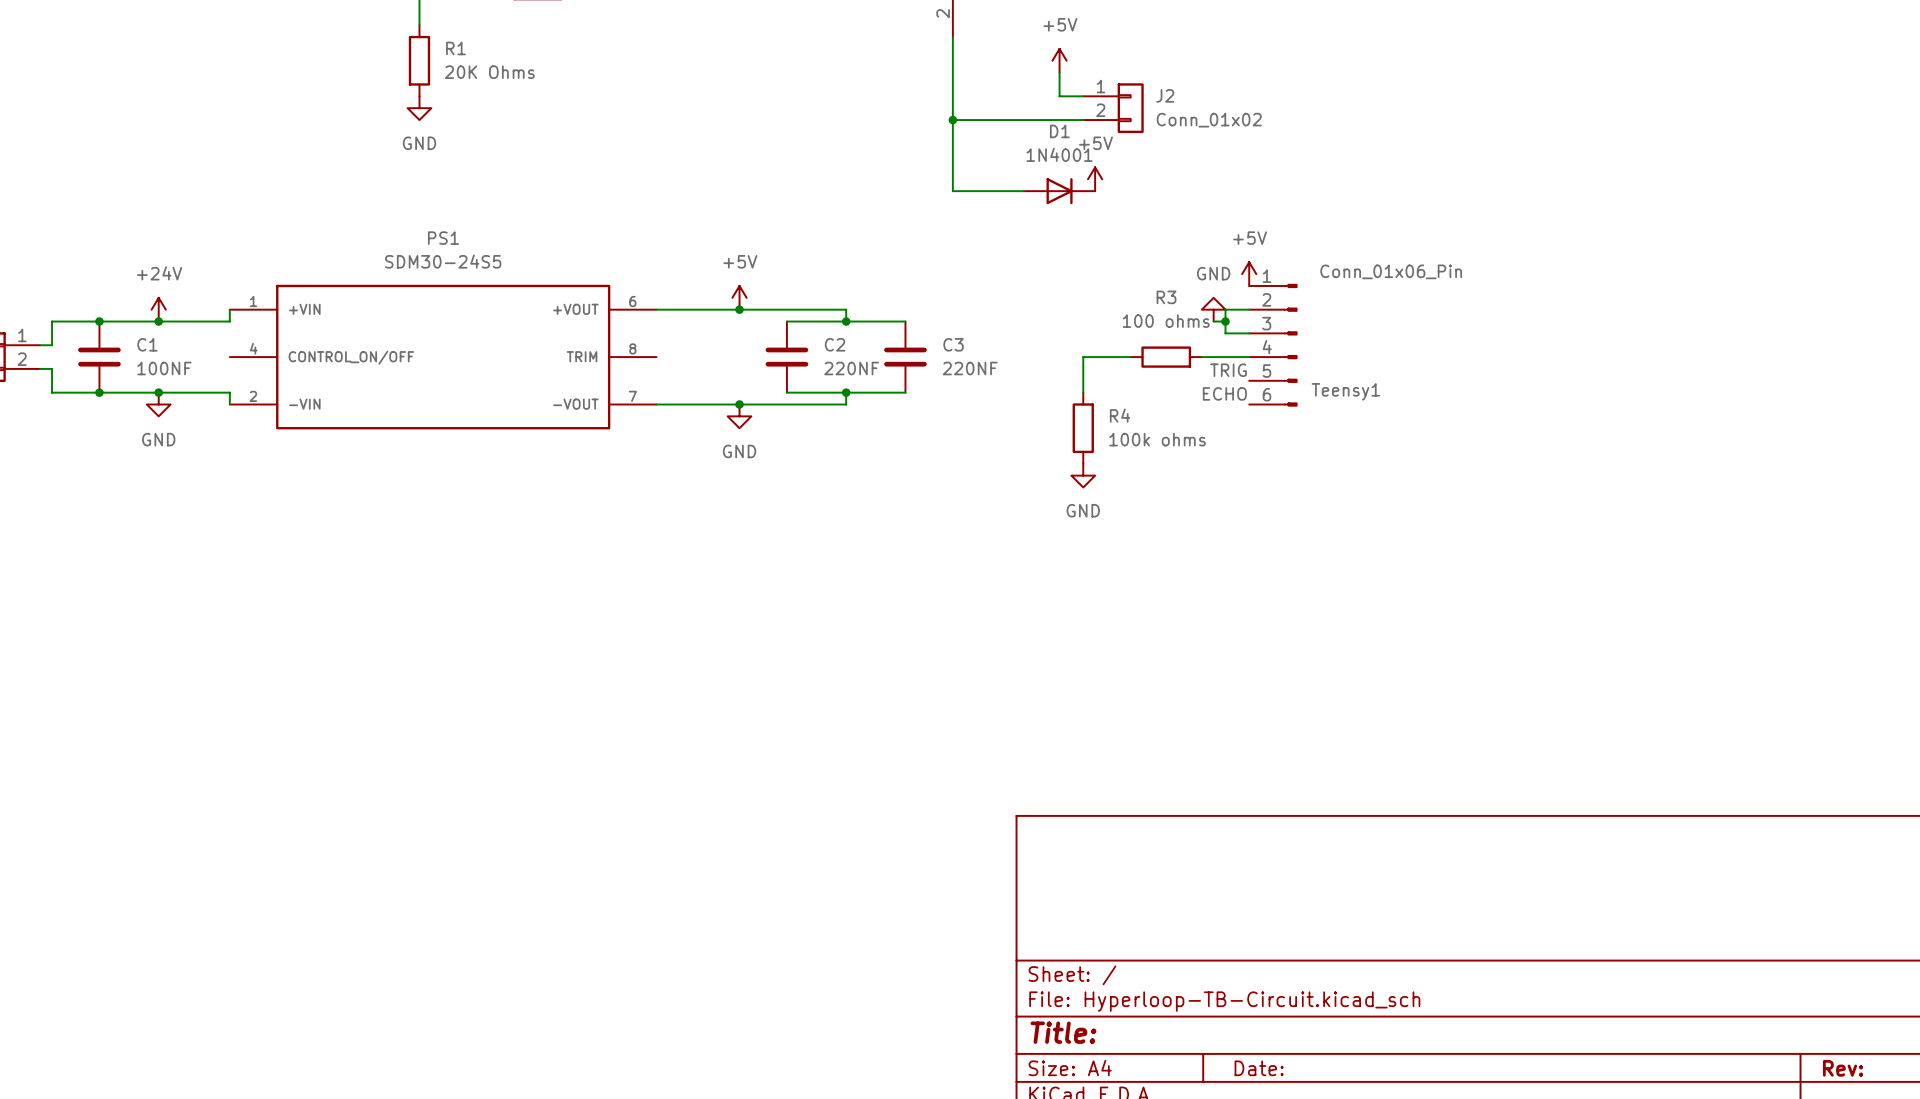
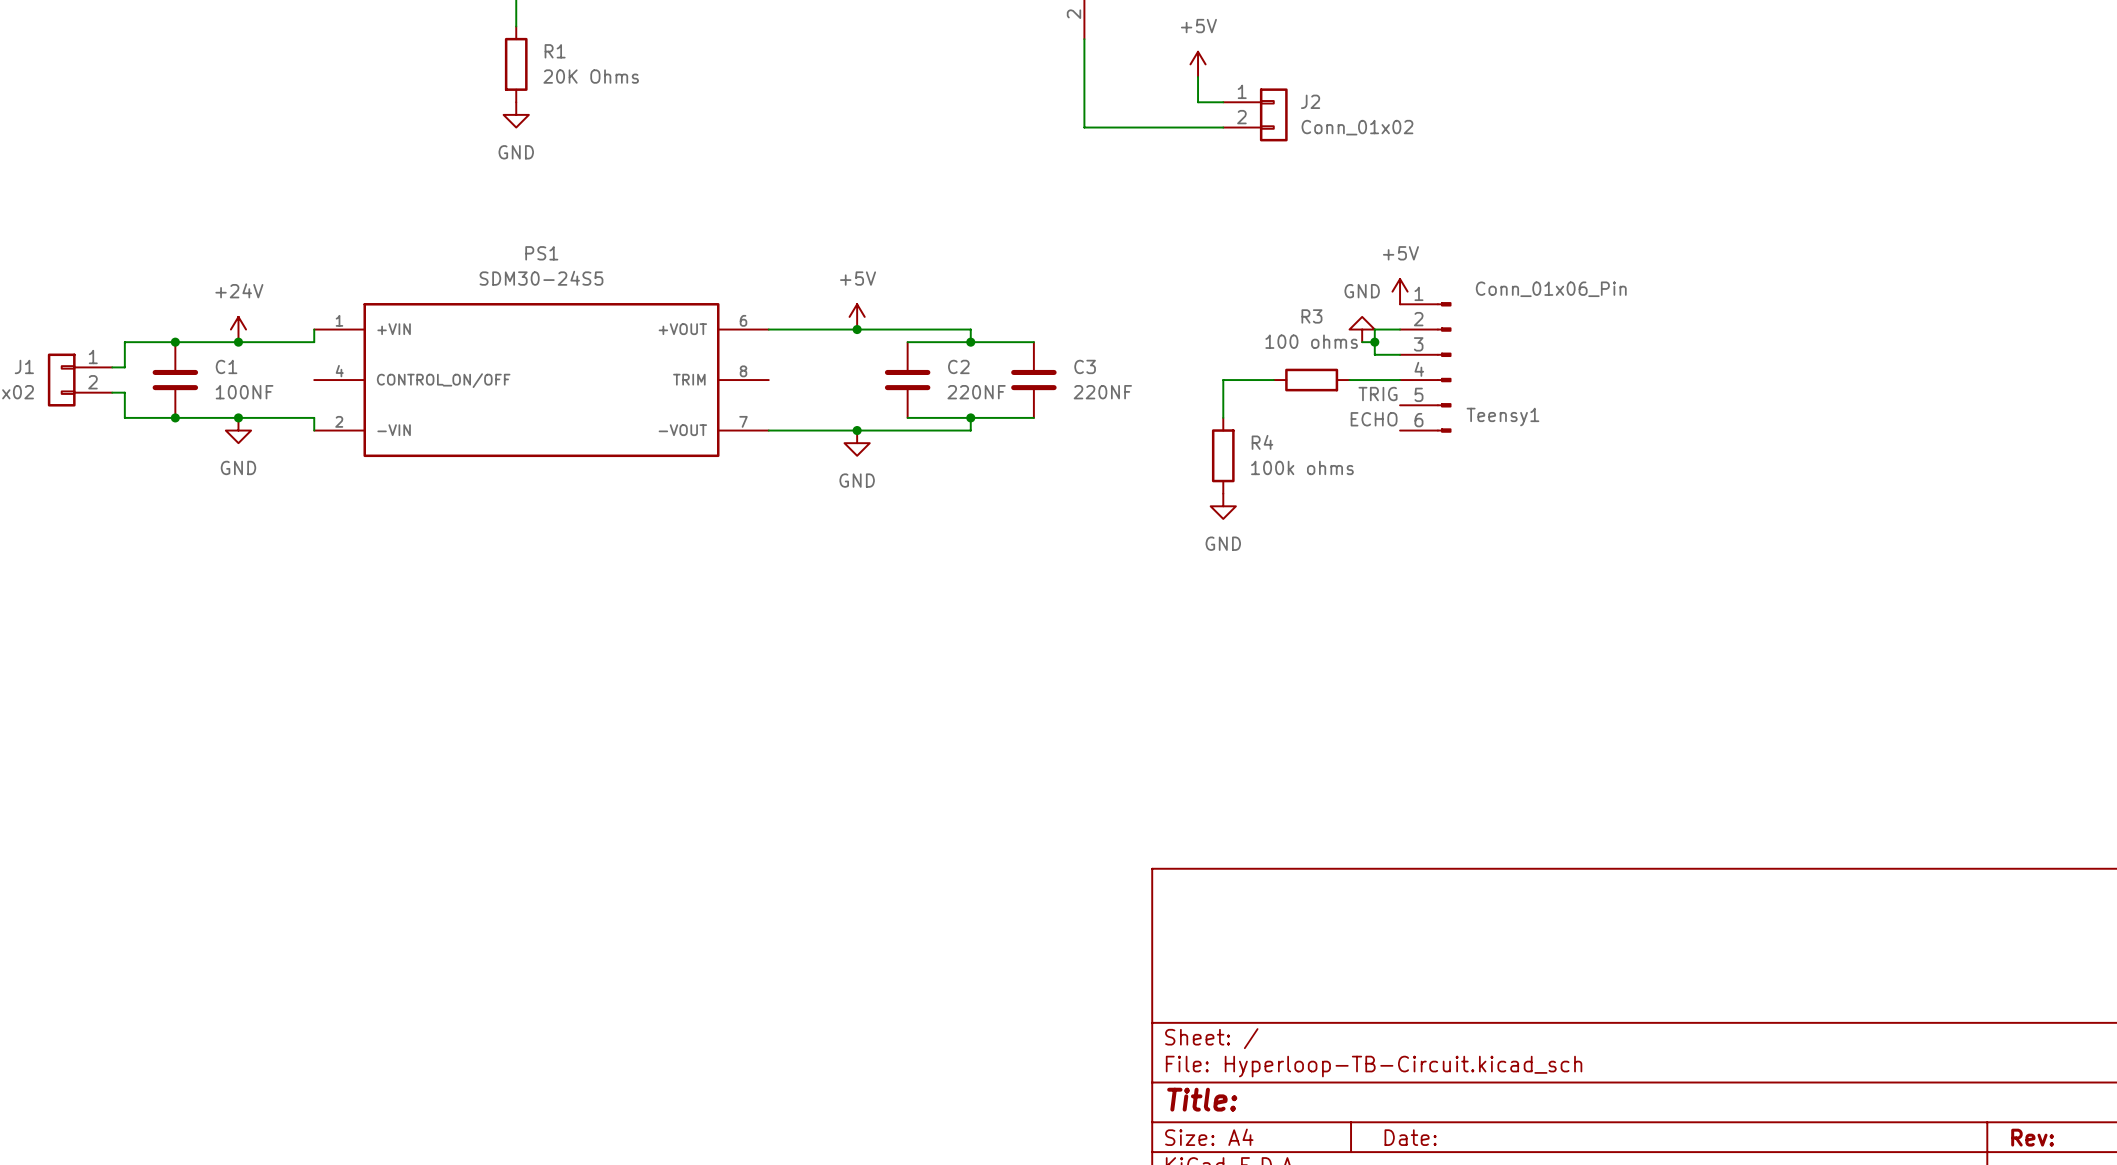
wire: (952, 120) (952, 191) (1024, 191) -> none
junction: (952, 120) -> none
power symbol: +5V (1095, 179) -> none
D1: 1N4001 (1059, 191) -> none

